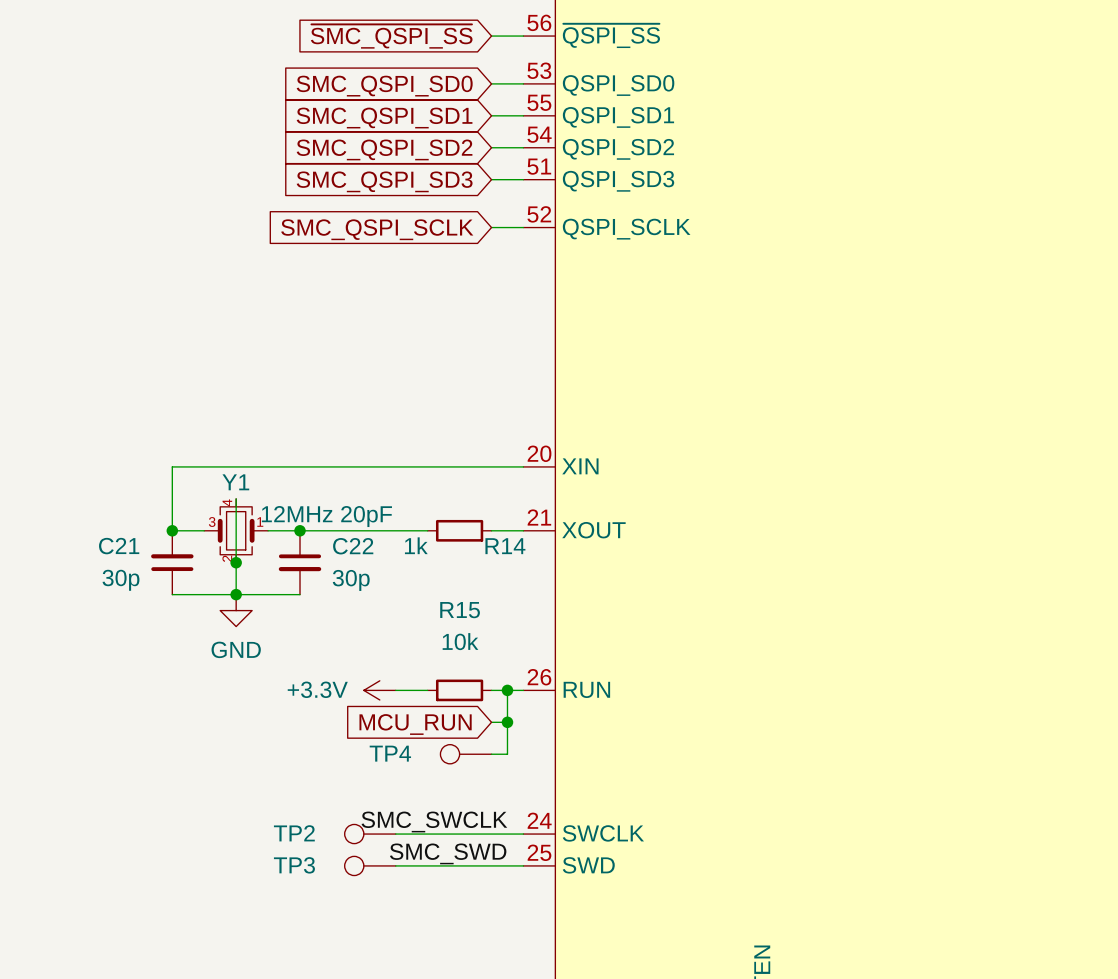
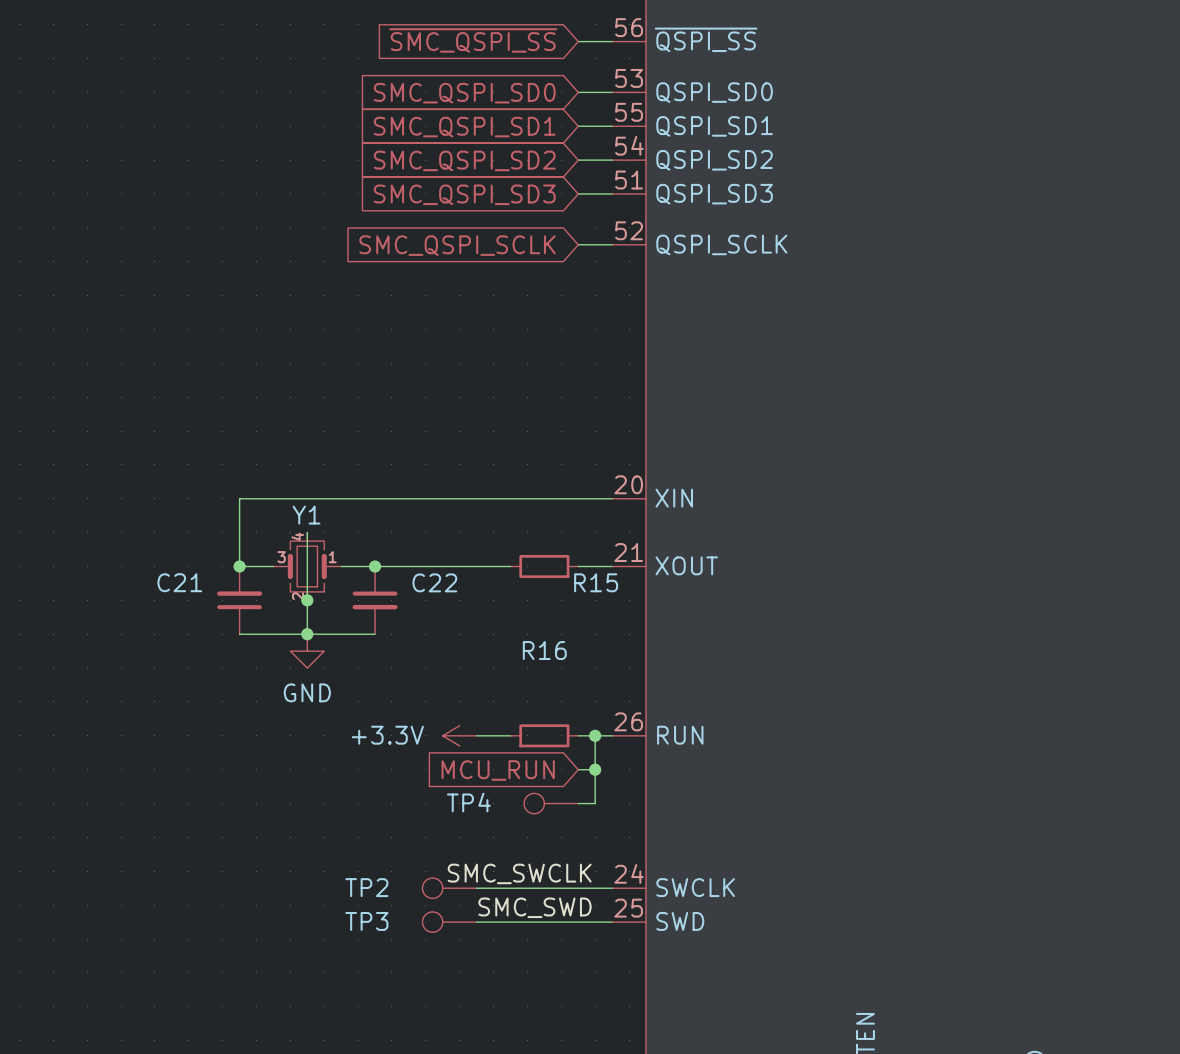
Y1 value: 12MHz 20pF (326, 516) -> none
R14 value: 1k (416, 545) -> none
R14 name: R14 (505, 546) -> R15 (596, 582)
C21 value: 30p (121, 580) -> none
C22 value: 30p (351, 580) -> none
R15 name: R15 (460, 610) -> R16 (544, 650)
R15 value: 10k (460, 641) -> none

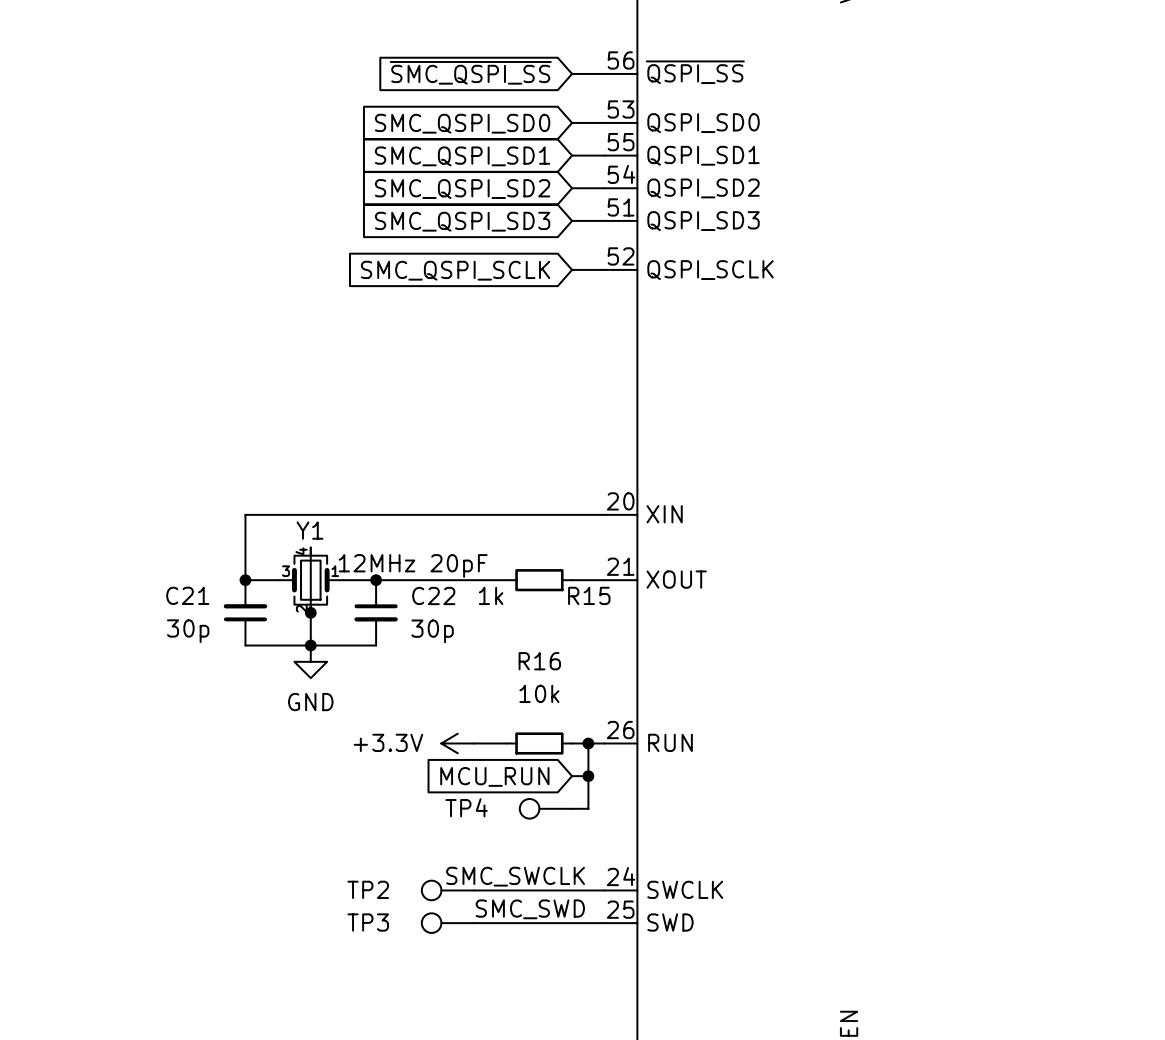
Y1 value: none -> 12MHz 20pF (413, 565)
R15 value: none -> 1k (491, 595)
C21 value: none -> 30p (188, 631)
C22 value: none -> 30p (432, 631)
R16 value: none -> 10k (539, 693)

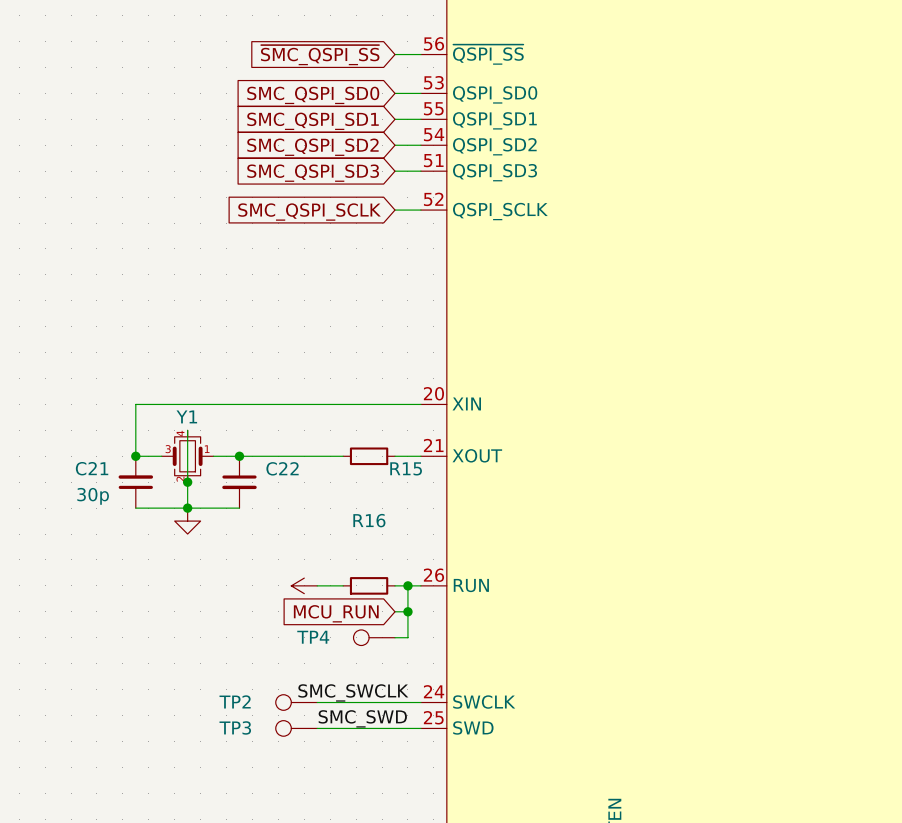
Y1 value: 12MHz 20pF (413, 565) -> none
R15 value: 1k (491, 595) -> none
C22 value: 30p (432, 631) -> none
R16 value: 10k (539, 693) -> none
power symbol text: GND (310, 702) -> none
power symbol text: +3.3V (388, 742) -> none

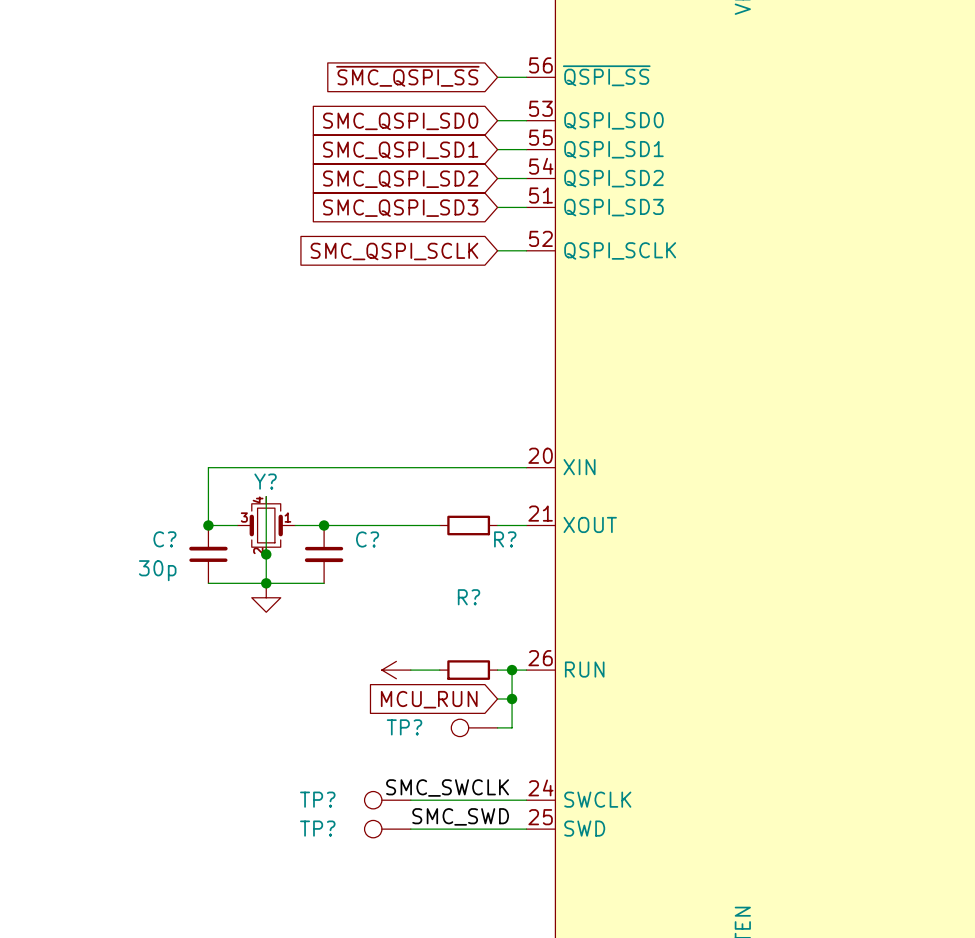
Y1 name: Y1 (186, 416) -> Y? (265, 481)
C21 name: C21 (92, 468) -> C? (164, 539)
C22 name: C22 (282, 468) -> C? (367, 539)
R15 name: R15 (406, 468) -> R? (505, 539)
R16 name: R16 (369, 520) -> R? (469, 597)
TP4 name: TP4 (313, 637) -> TP? (404, 727)
TP2 name: TP2 (235, 701) -> TP? (317, 799)
TP3 name: TP3 (235, 727) -> TP? (317, 828)

